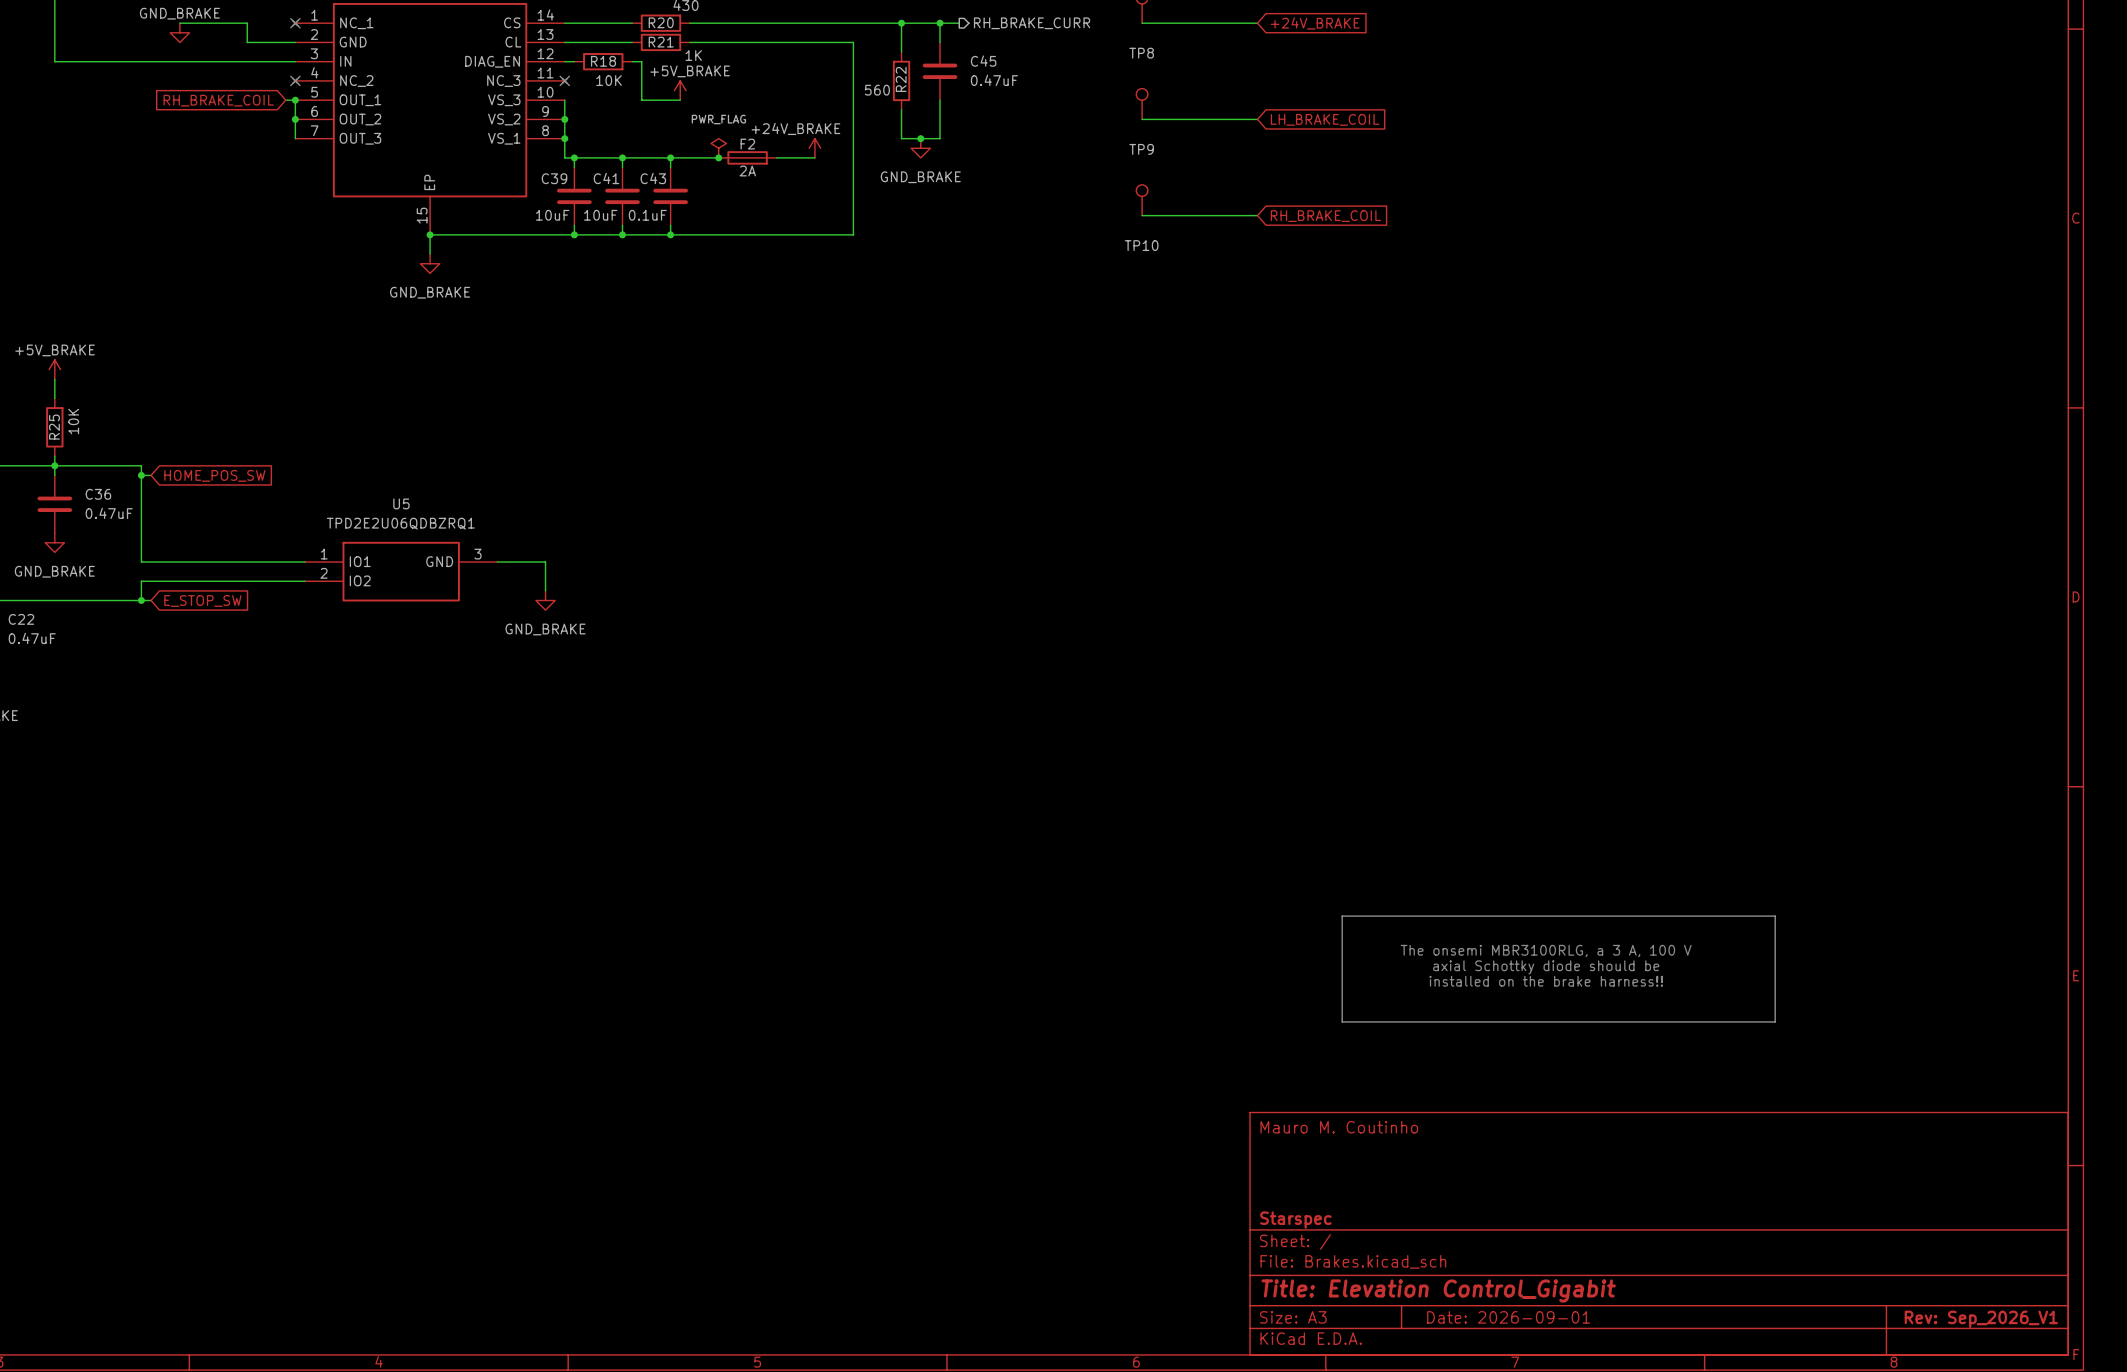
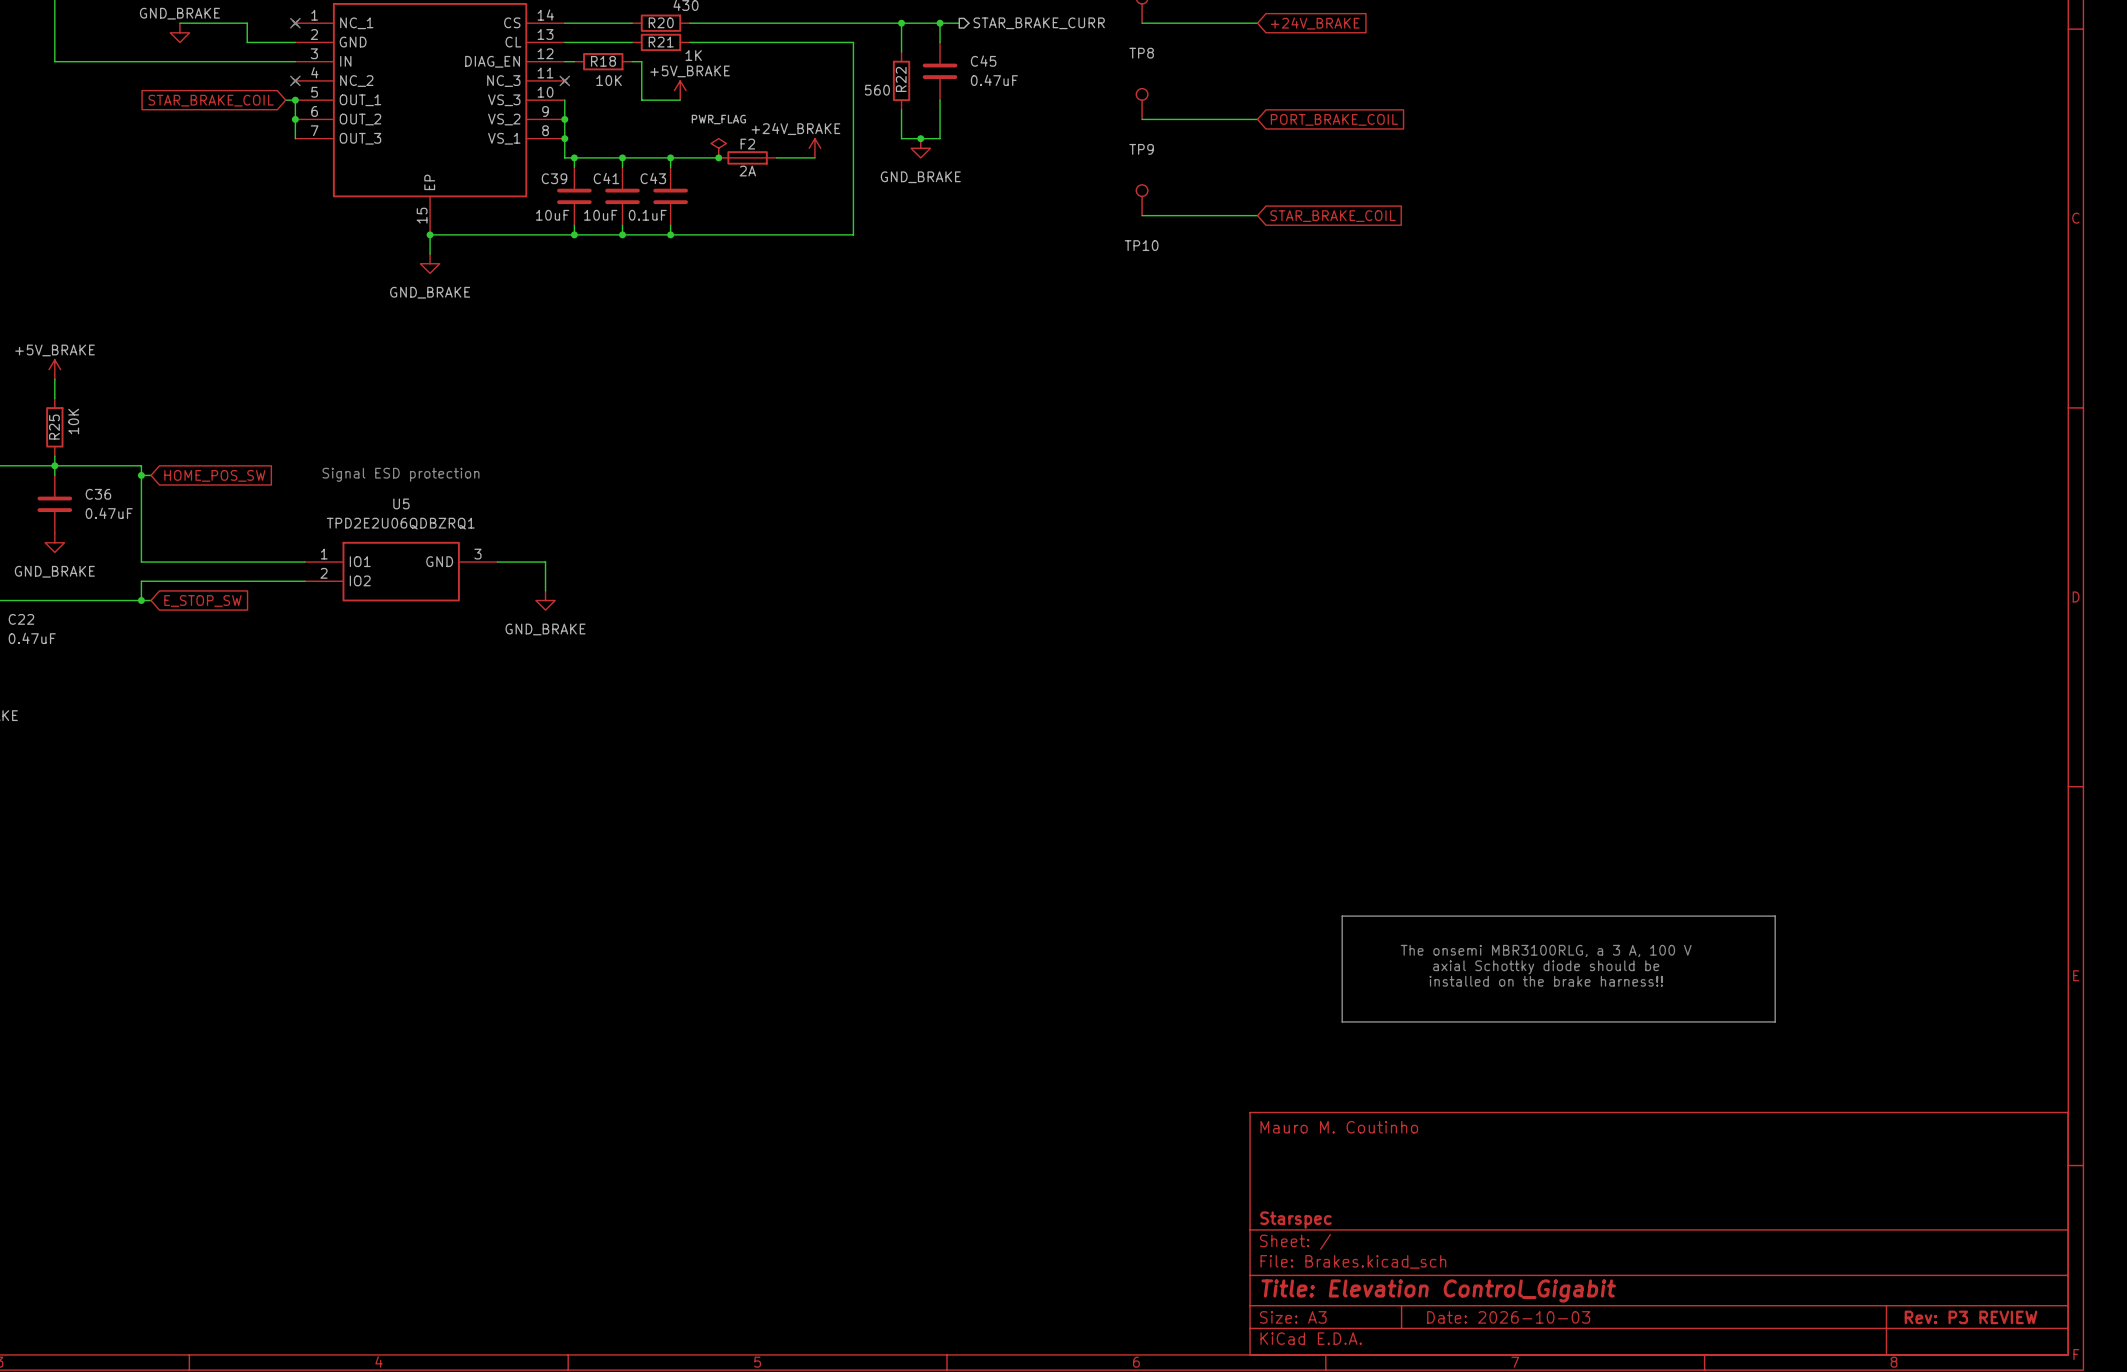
hierarchical label: RH_BRAKE_CURR (1032, 23) -> STAR_BRAKE_CURR (1039, 23)
global label: RH_BRAKE_COIL (218, 100) -> STAR_BRAKE_COIL (211, 100)
global label: LH_BRAKE_COIL (1325, 119) -> PORT_BRAKE_COIL (1334, 119)
global label: RH_BRAKE_COIL (1325, 216) -> STAR_BRAKE_COIL (1333, 216)
text: none -> Signal ESD protection (400, 474)
title block: Date: 2026-09-01 (1508, 1317) -> Date: 2026-10-03 (1508, 1317)
title block: Rev: Sep_2026_V1 (1981, 1319) -> Rev: P3 REVIEW (1971, 1317)

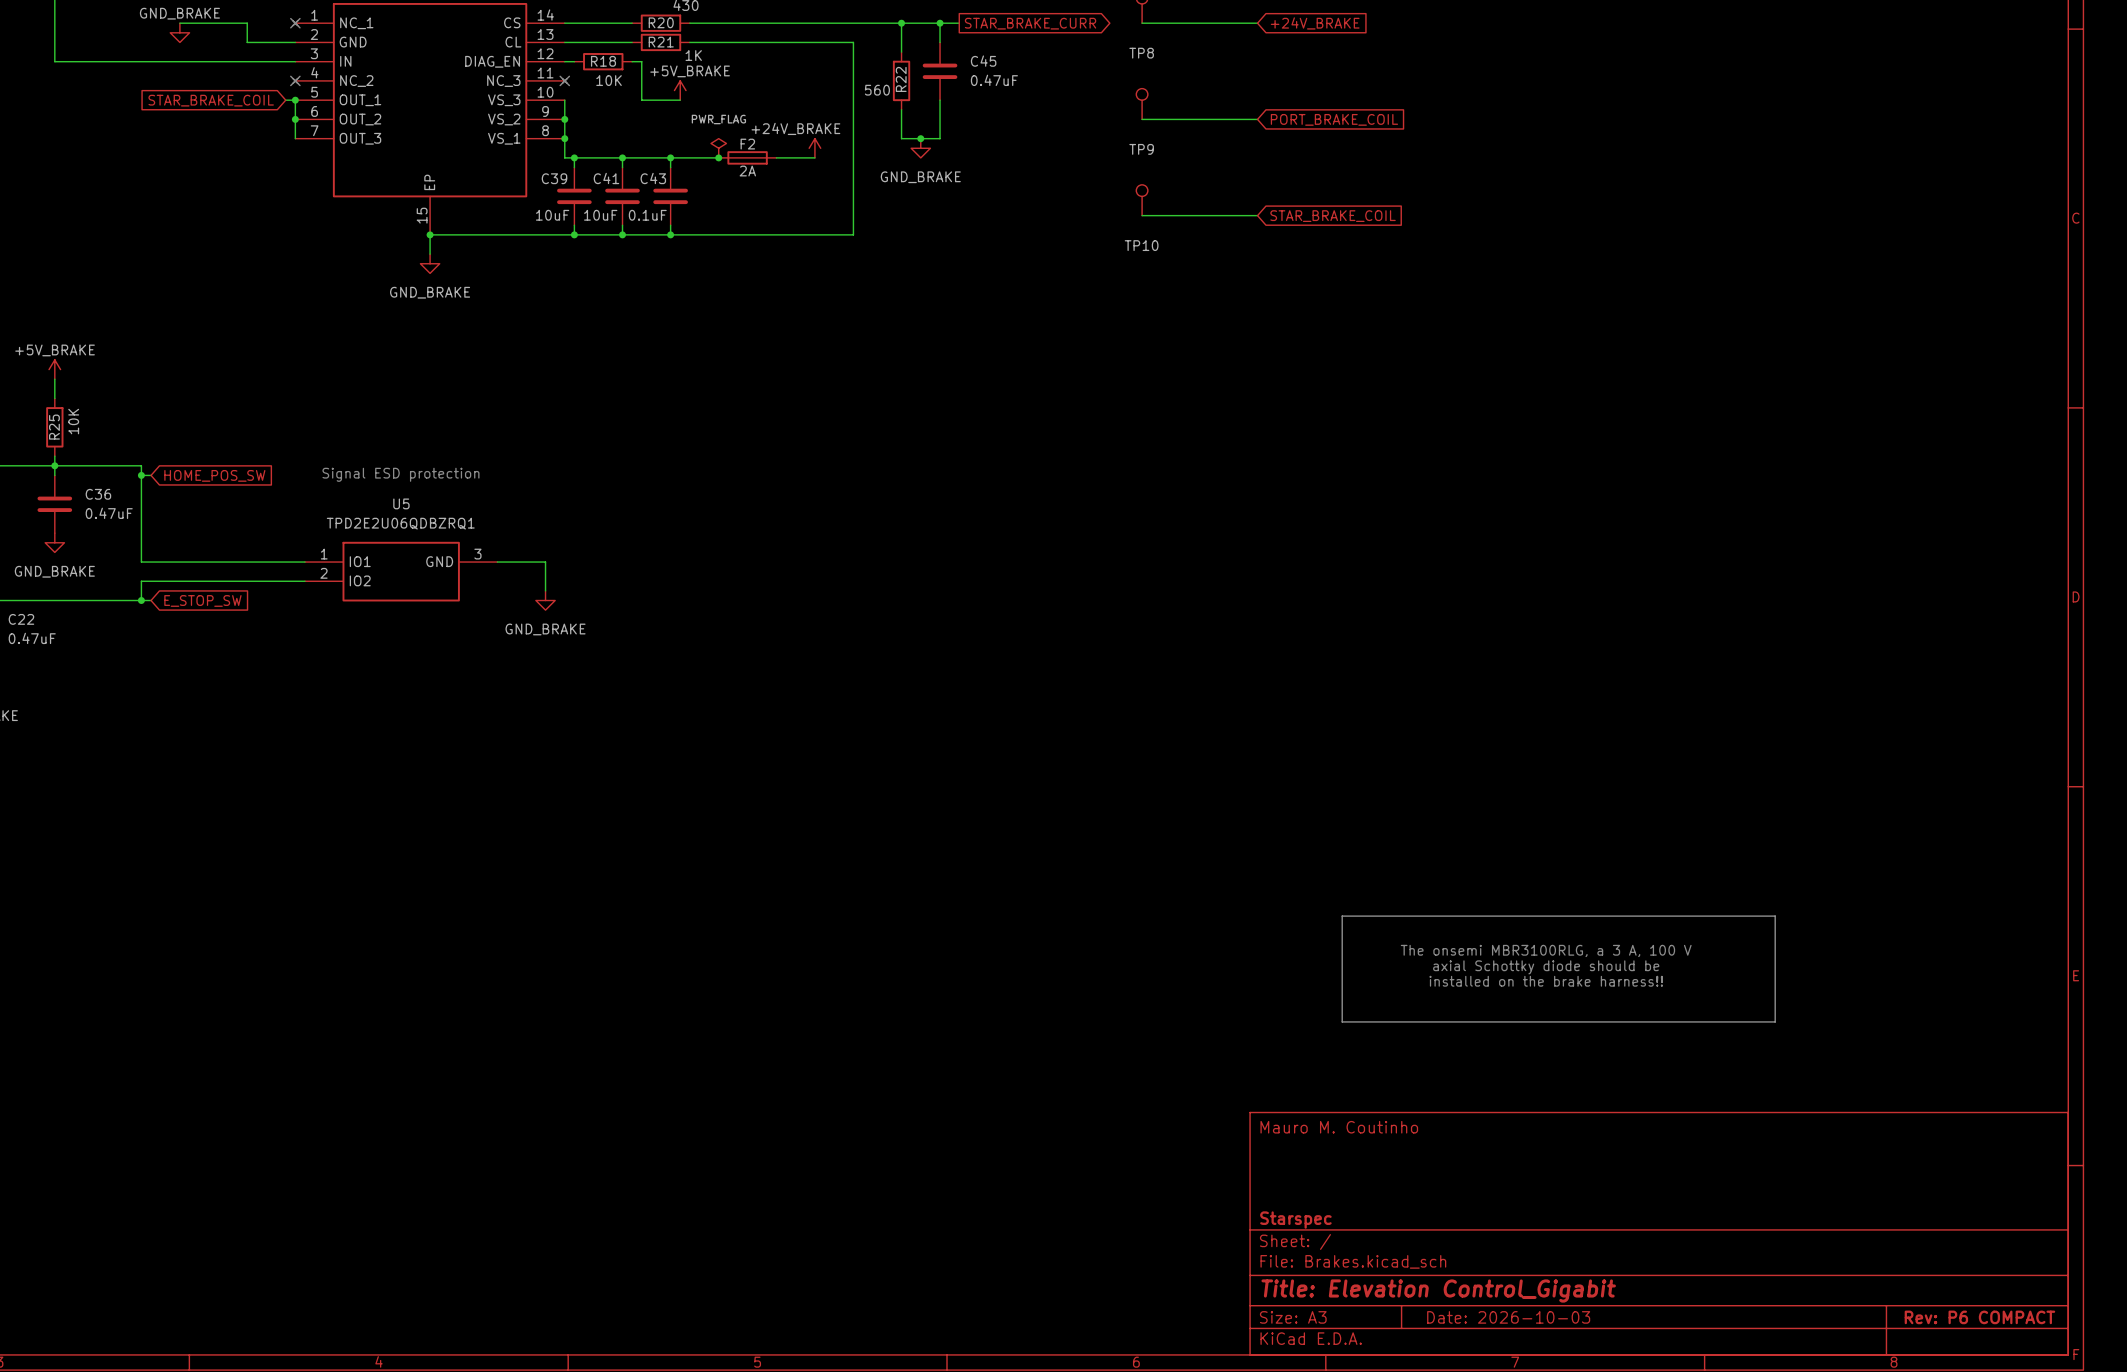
global label: none -> STAR_BRAKE_CURR (1030, 23)
hierarchical label: STAR_BRAKE_CURR (1039, 23) -> none
title block: Rev: P3 REVIEW (1971, 1317) -> Rev: P6 COMPACT (1979, 1317)

